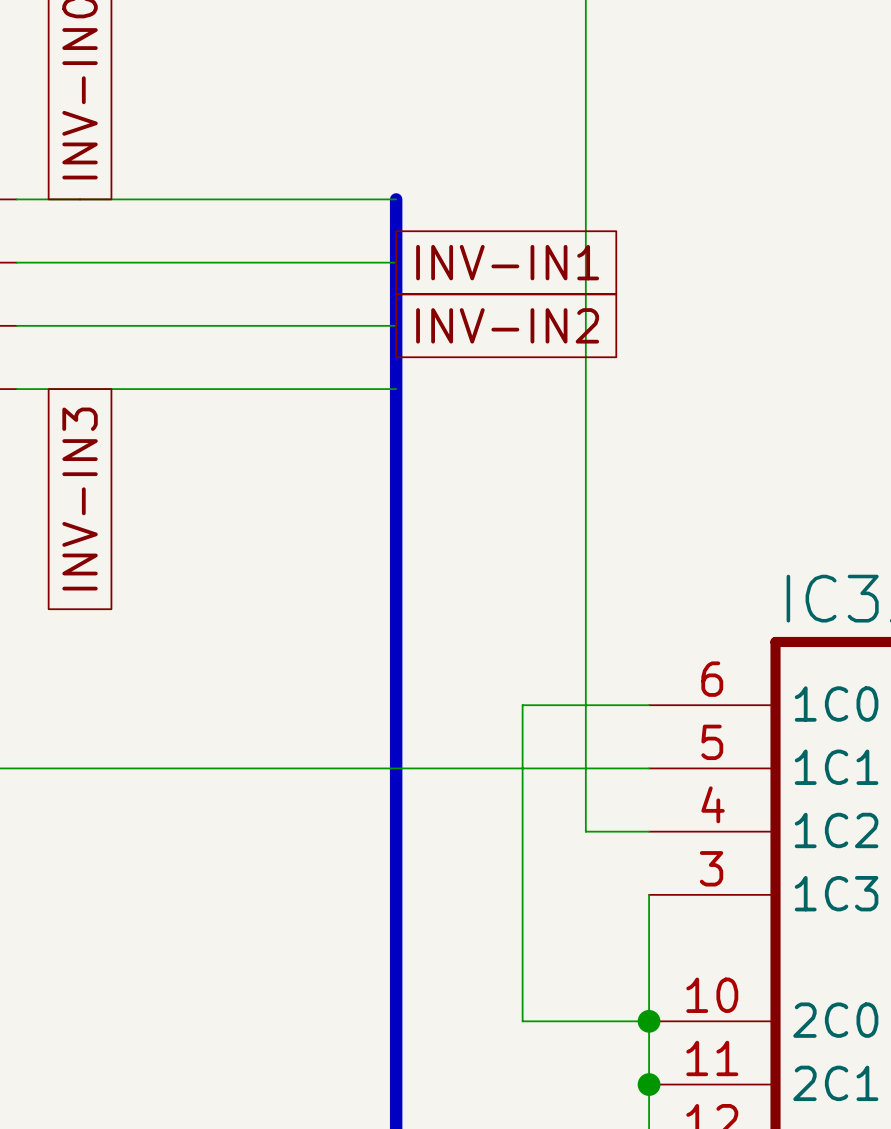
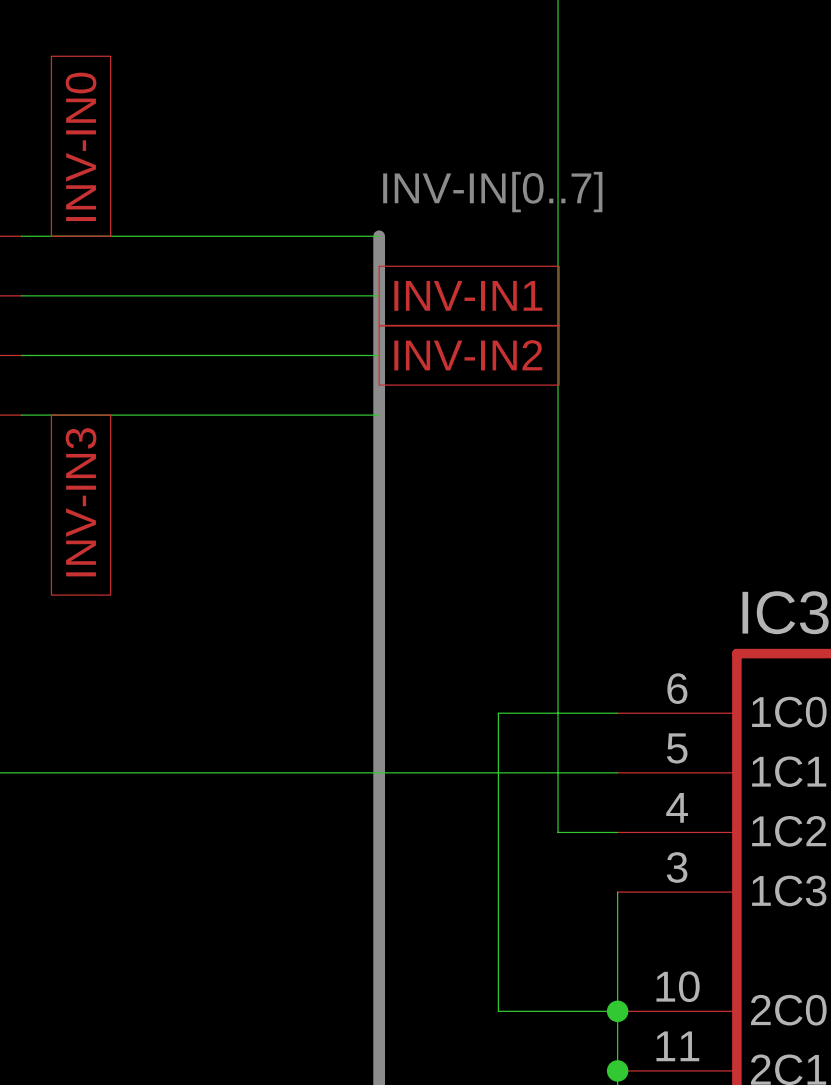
text: none -> INV-IN[0..7] (492, 192)

